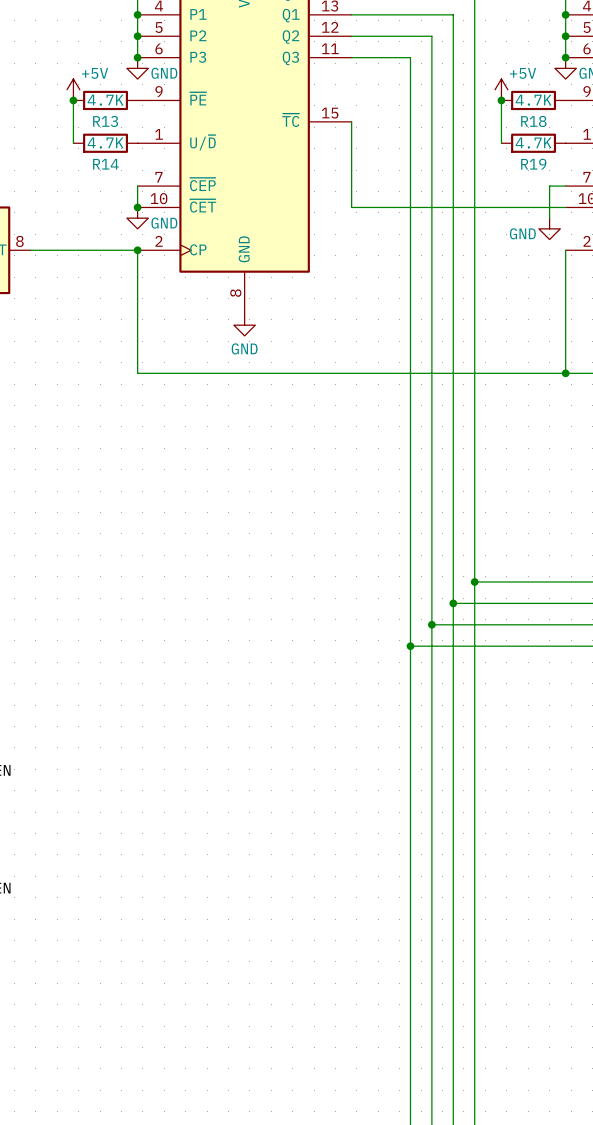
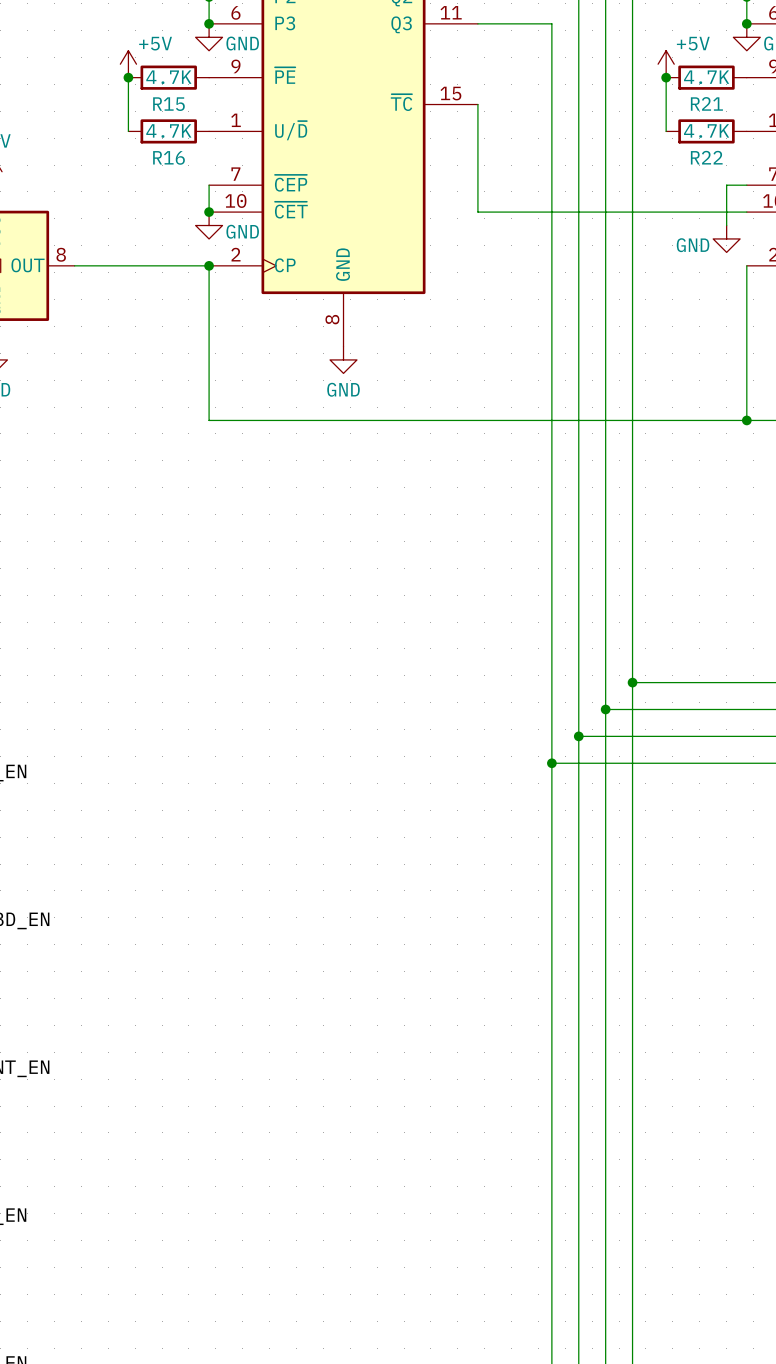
R13 name: R13 (105, 121) -> R15 (168, 104)
R18 name: R18 (533, 121) -> R21 (706, 103)
R14 name: R14 (105, 164) -> R16 (168, 157)
R19 name: R19 (533, 164) -> R22 (706, 157)

